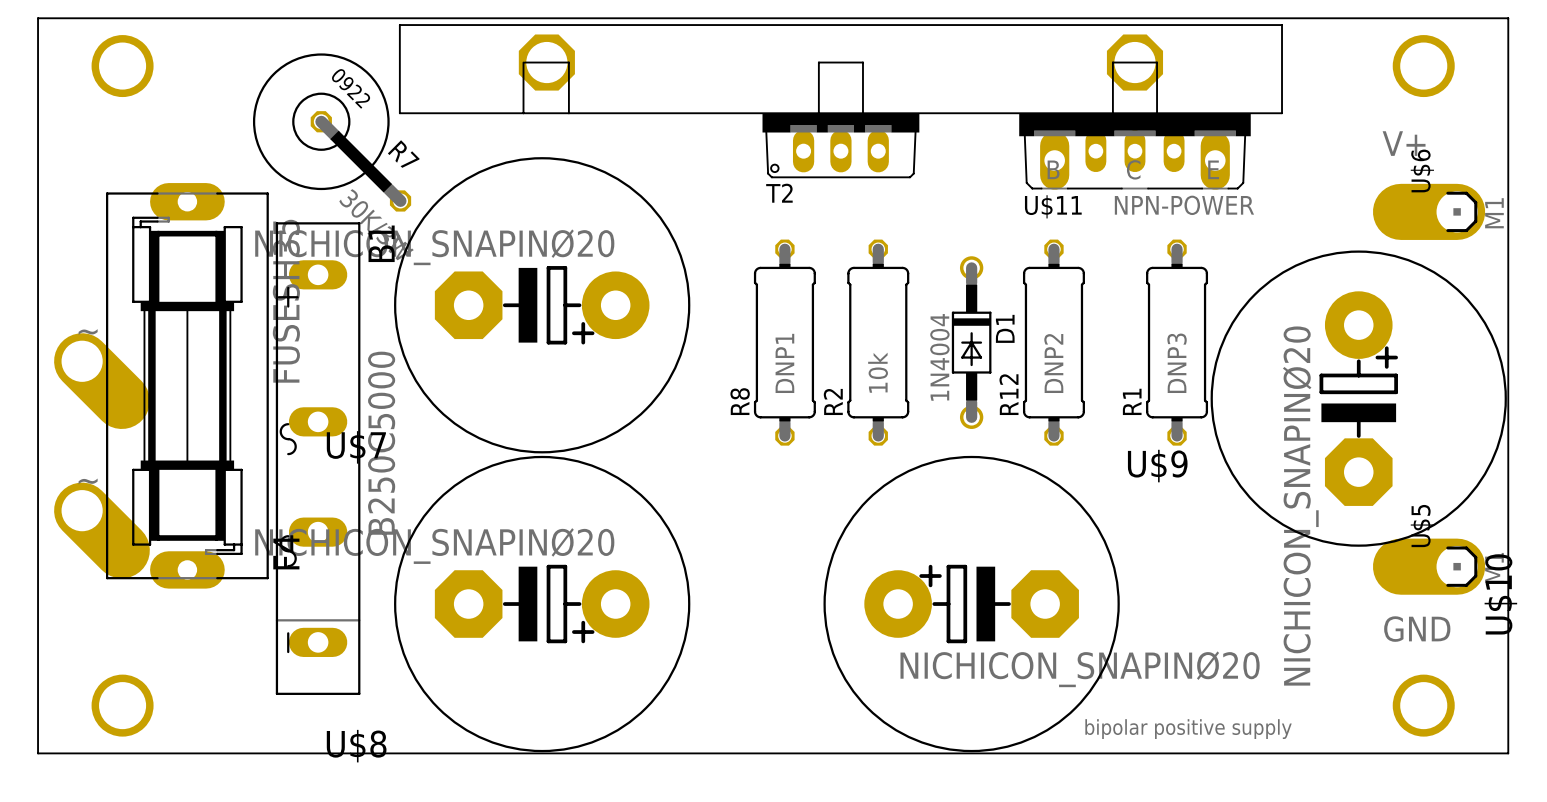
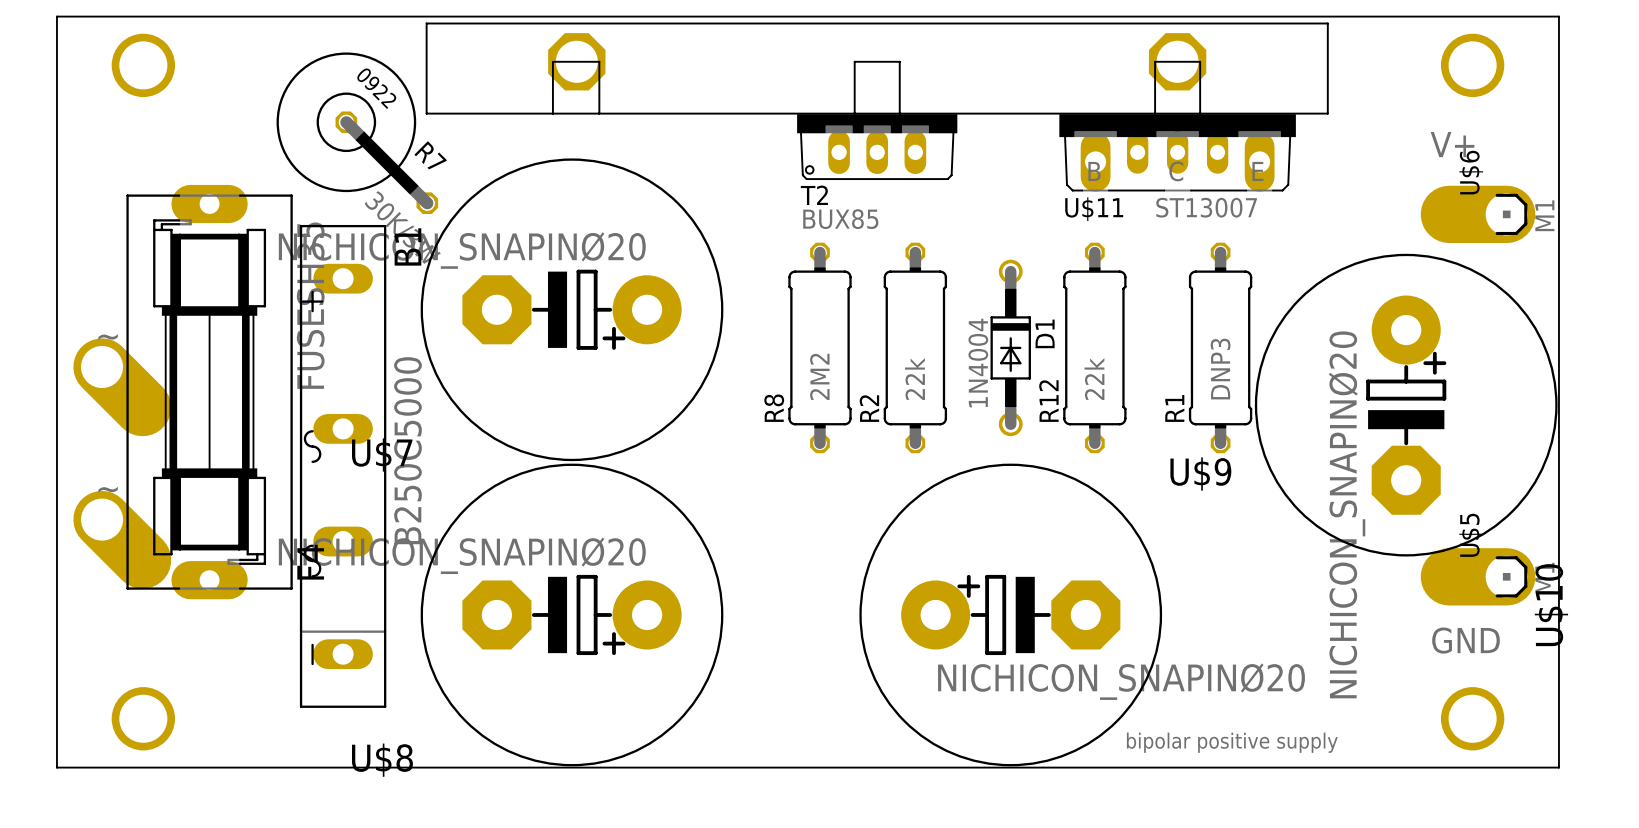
U$11 value: NPN-POWER (1184, 205) -> ST13007 (1206, 207)
T2 value: none -> BUX85 (840, 219)
R8 value: DNP1 (784, 363) -> 2M2 (819, 376)
R12 value: DNP2 (1053, 363) -> 22k (1094, 379)
R2 value: 10k (878, 372) -> 22k (914, 379)

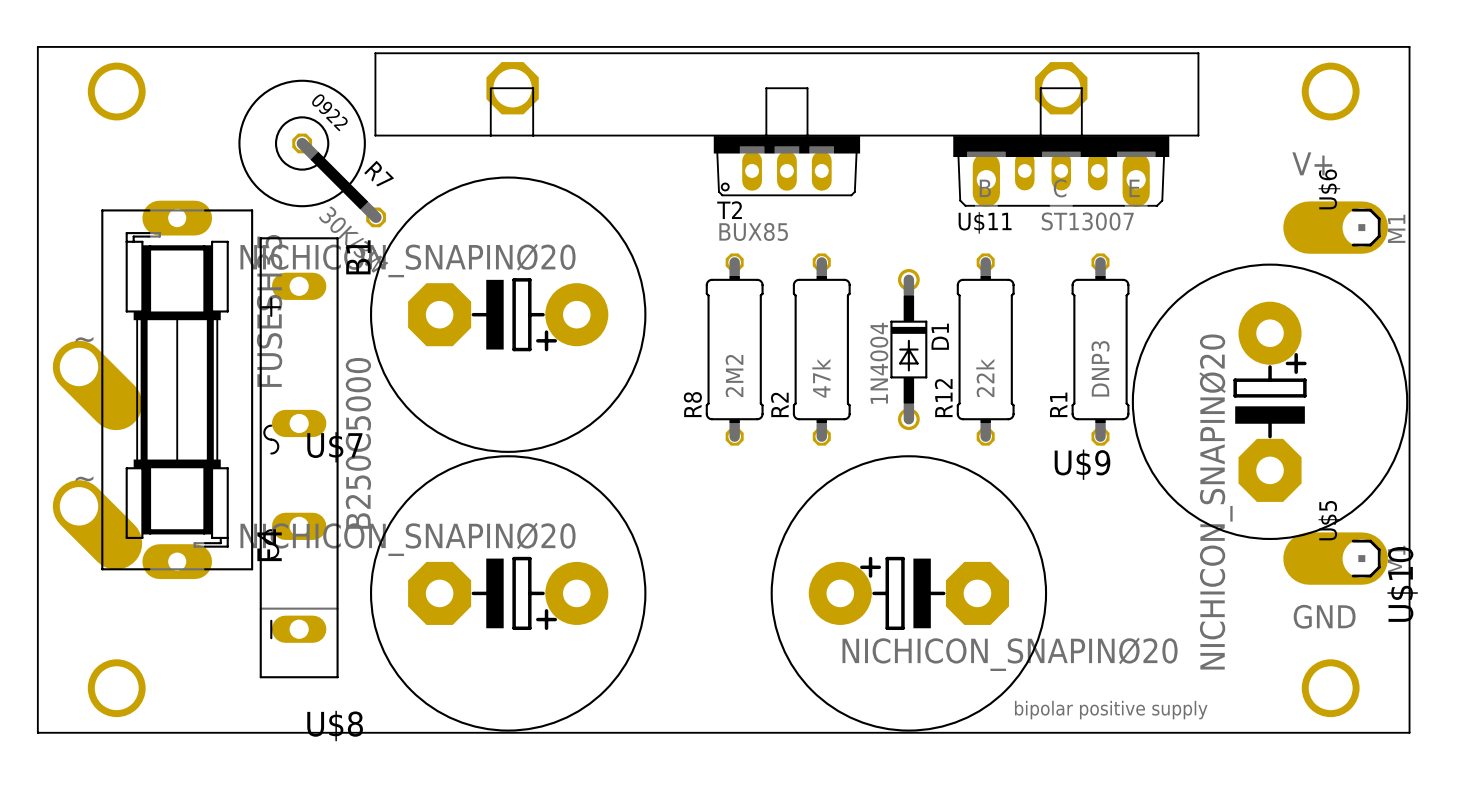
R2 value: 22k (914, 379) -> 47k (821, 378)

